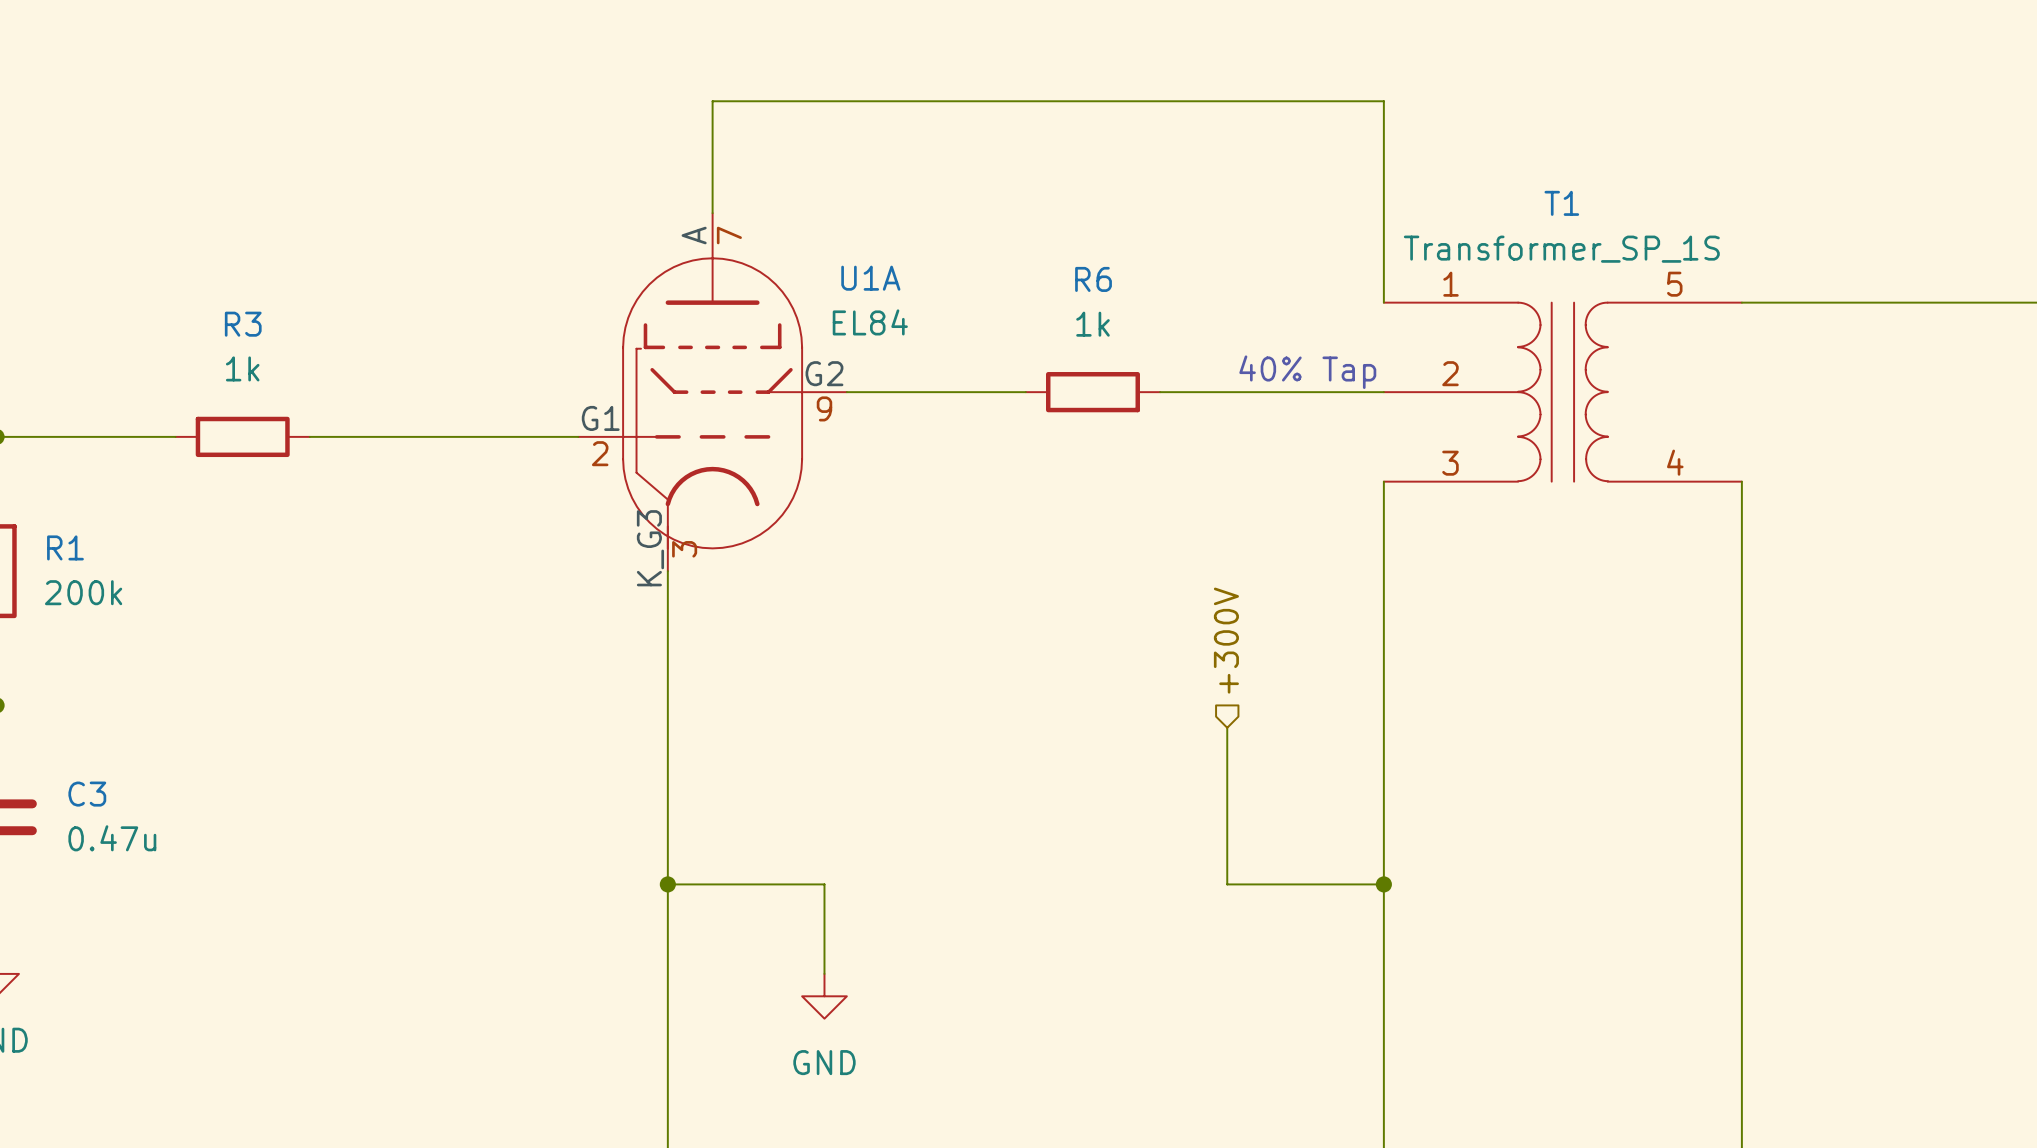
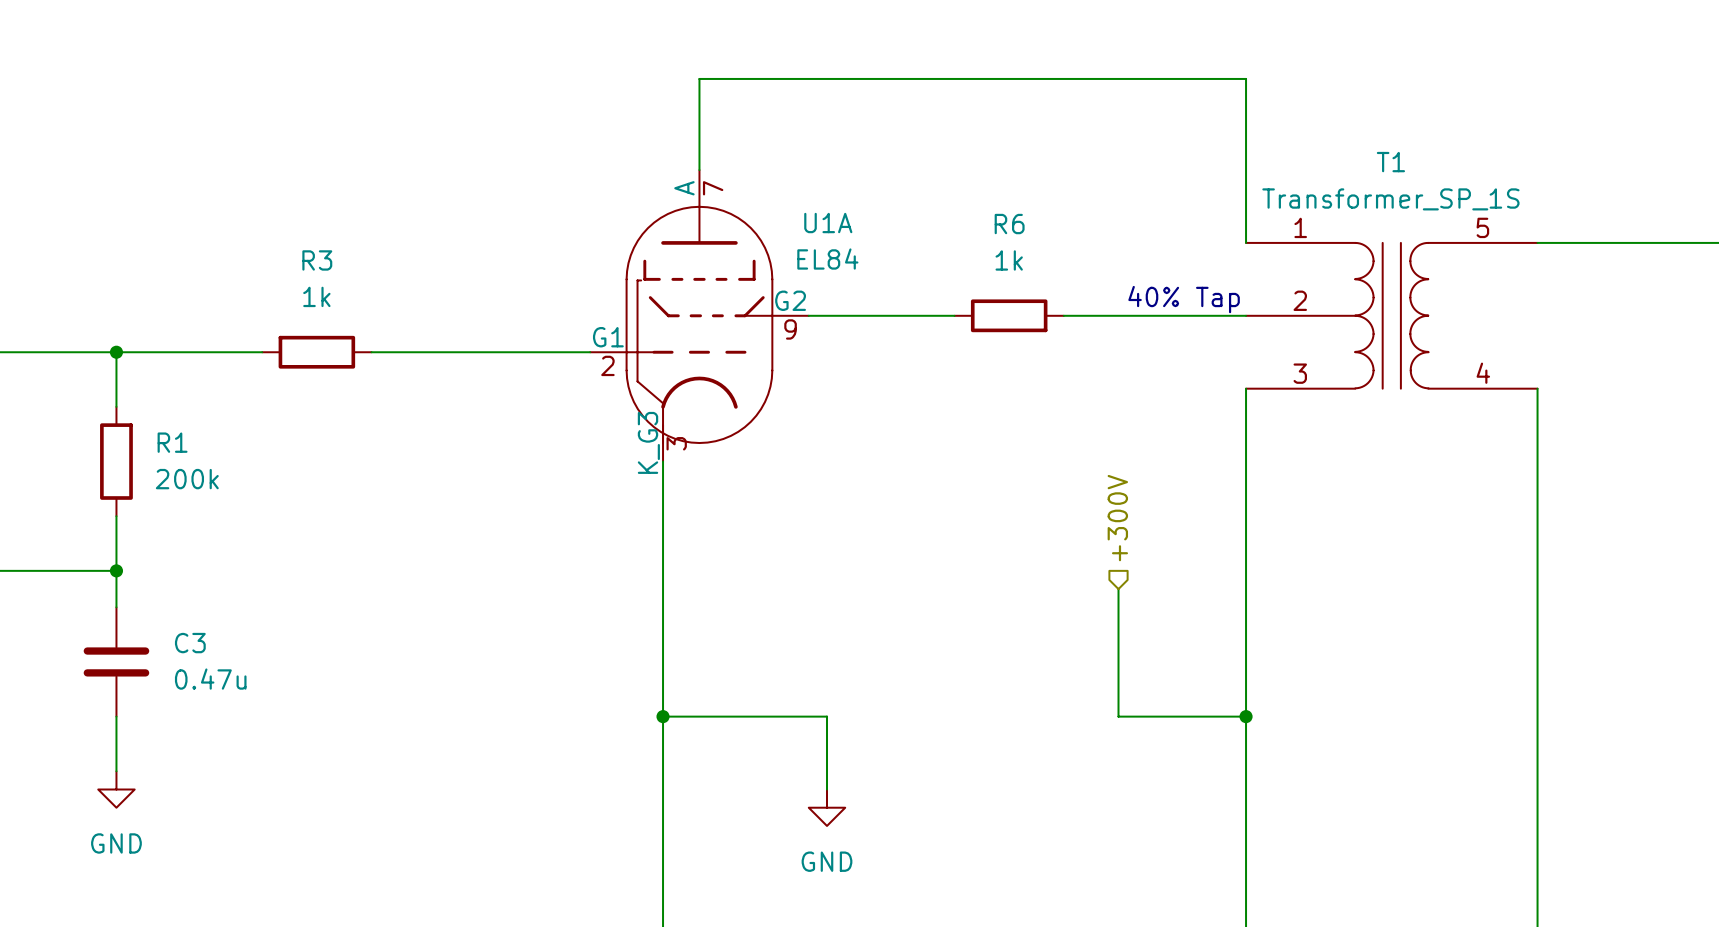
wire: (824, 884) (824, 973) -> (790, 716) (827, 716) (827, 789)
power symbol position: GND (824, 996) -> GND (827, 807)

